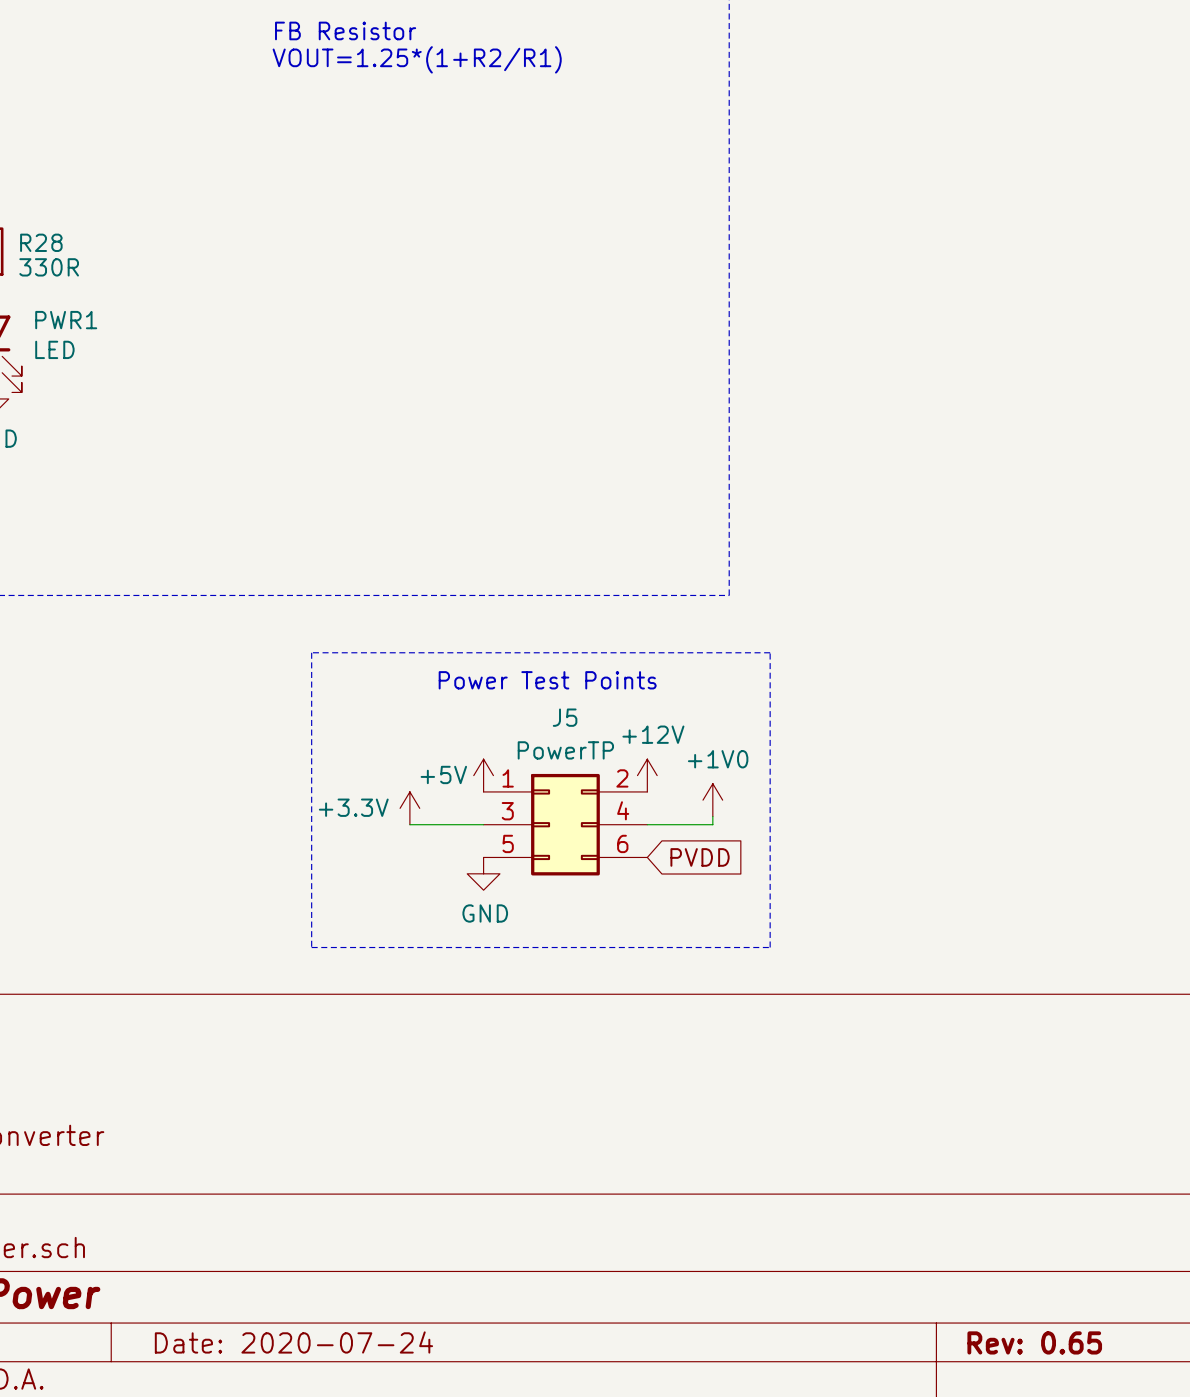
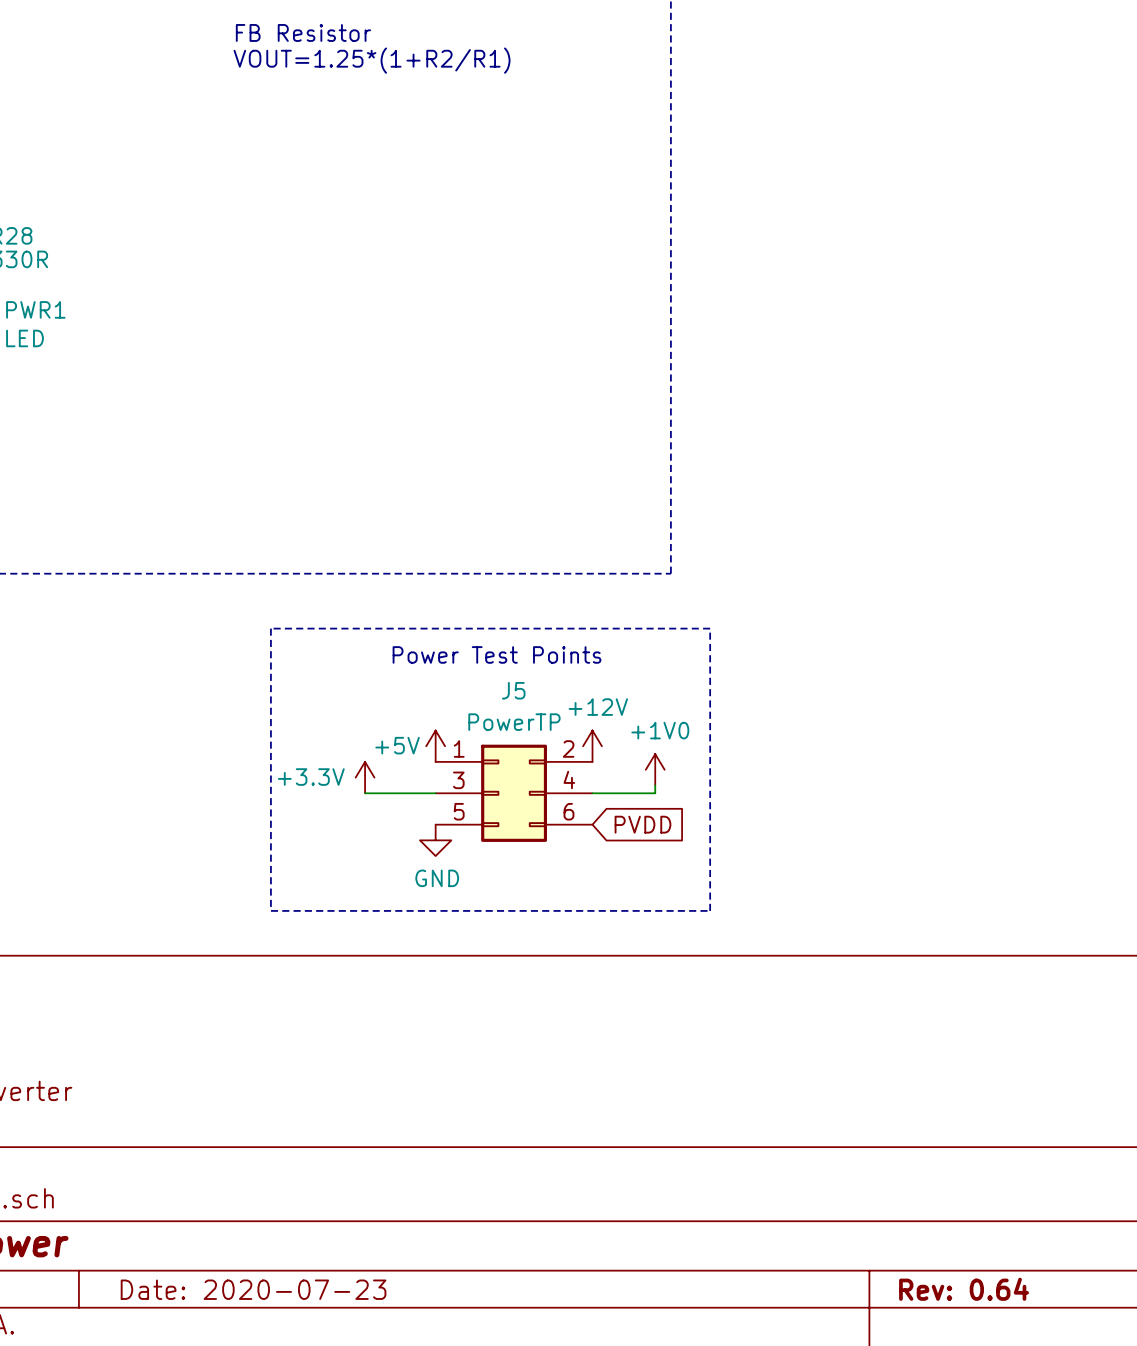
title block: Date: 2020-07-24 (293, 1342) -> Date: 2020-07-23 (253, 1289)
title block: Rev: 0.65 (1034, 1342) -> Rev: 0.64 (964, 1289)

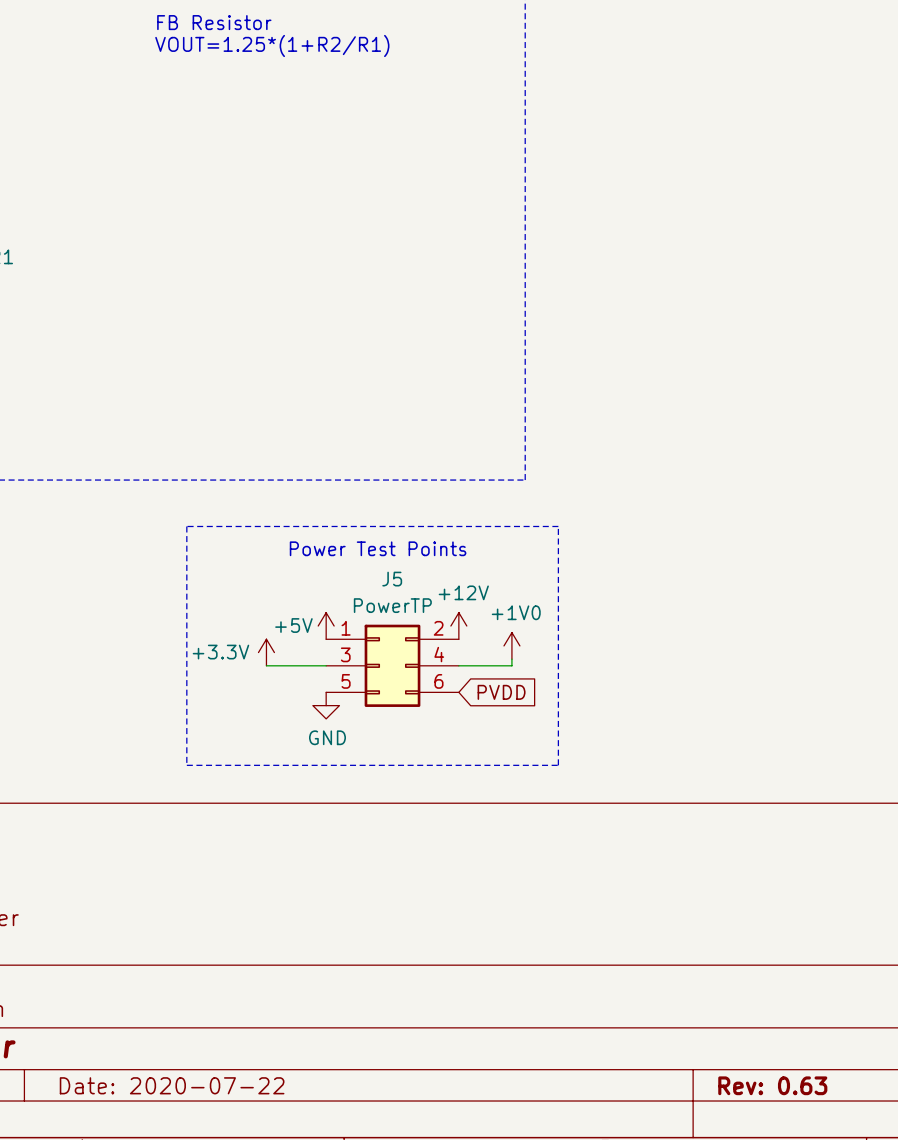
title block: Date: 2020-07-23 (253, 1289) -> Date: 2020-07-22 (172, 1085)
title block: Rev: 0.64 (964, 1289) -> Rev: 0.63 (772, 1085)

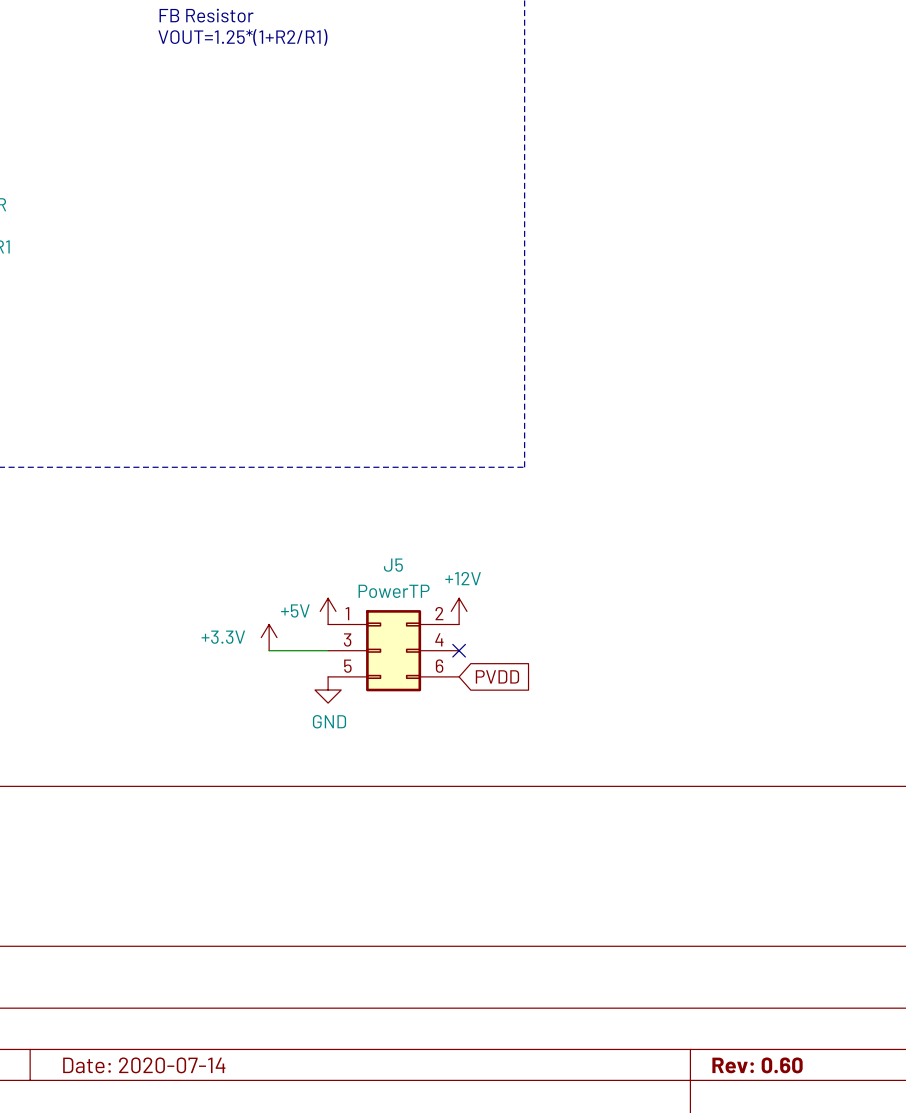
line: (186, 526) (186, 765) (558, 765) (558, 526) (186, 526) -> none
text: Power Test Points (378, 548) -> none
power symbol: +1V0 (511, 645) -> none
wire: (511, 659) (511, 665) (458, 665) -> none
no-connect mark: none -> (459, 650)
title block: Date: 2020-07-22 (172, 1085) -> Date: 2020-07-14 (144, 1065)
title block: Rev: 0.63 (772, 1085) -> Rev: 0.60 (757, 1065)

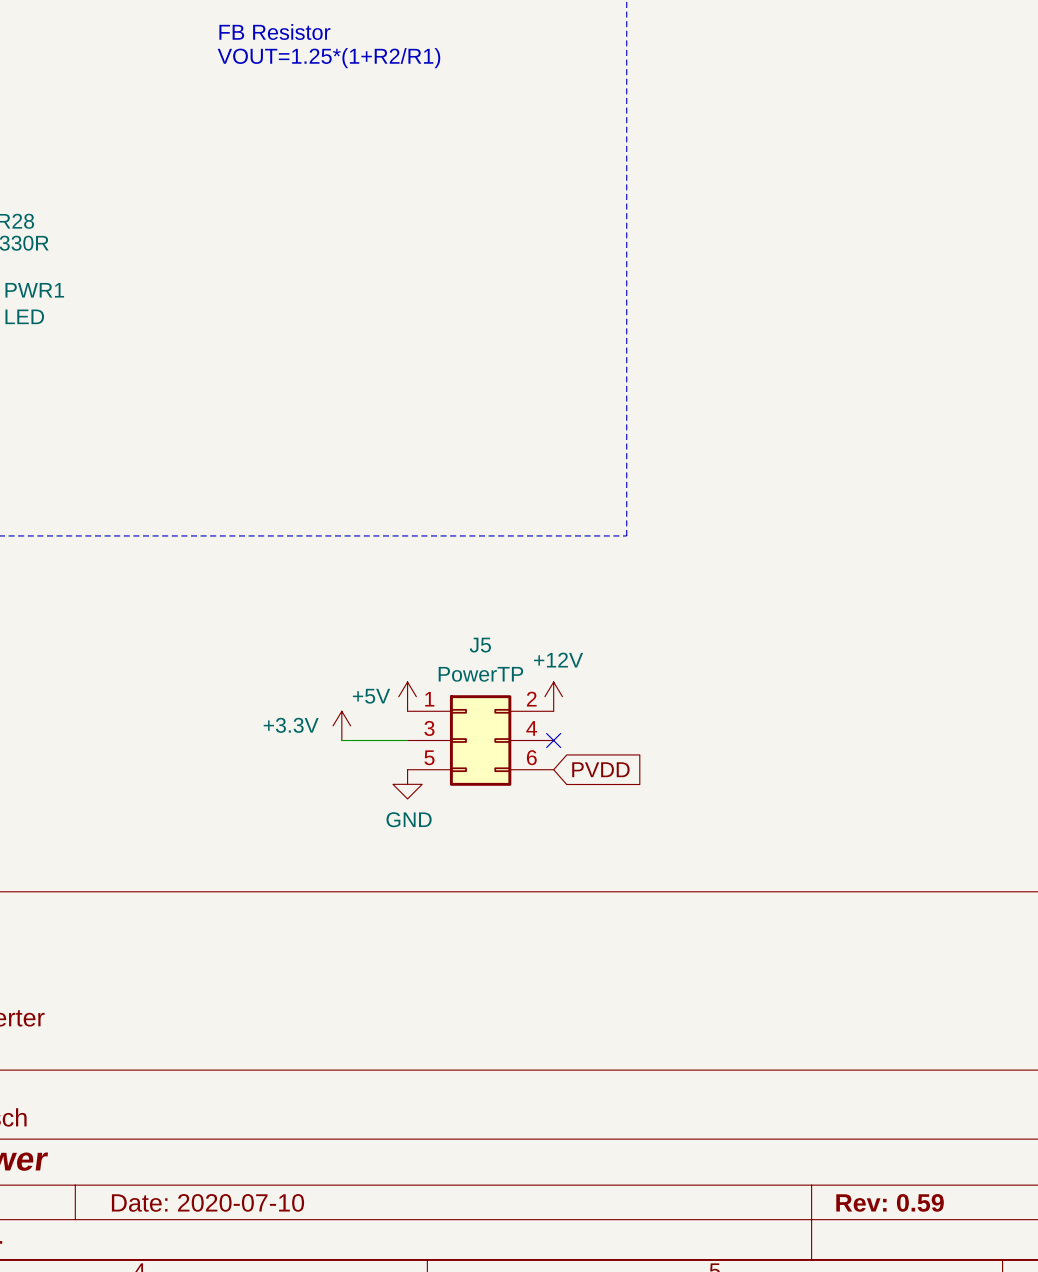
title block: Date: 2020-07-14 (144, 1065) -> Date: 2020-07-10 (207, 1202)
title block: Rev: 0.60 (757, 1065) -> Rev: 0.59 (890, 1202)

